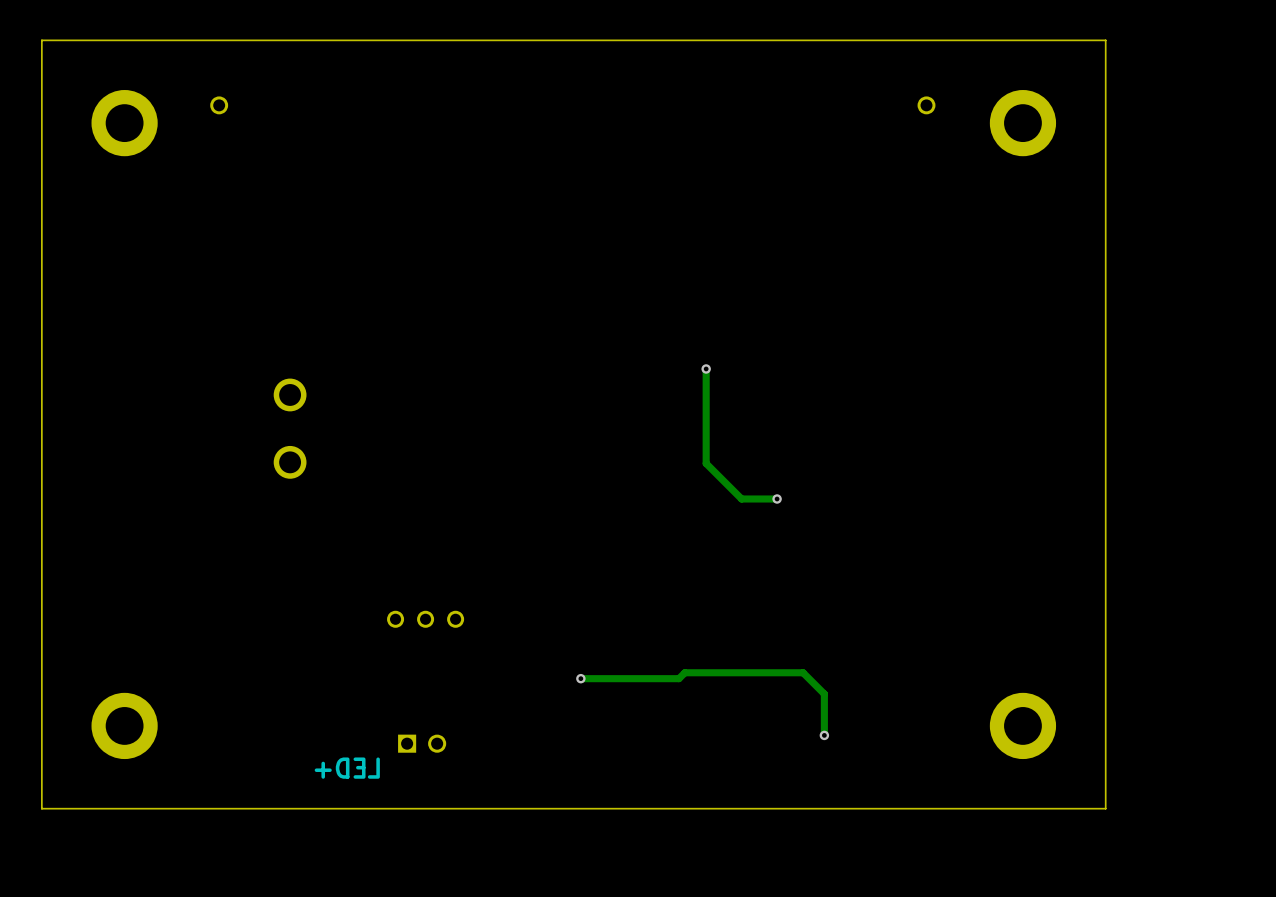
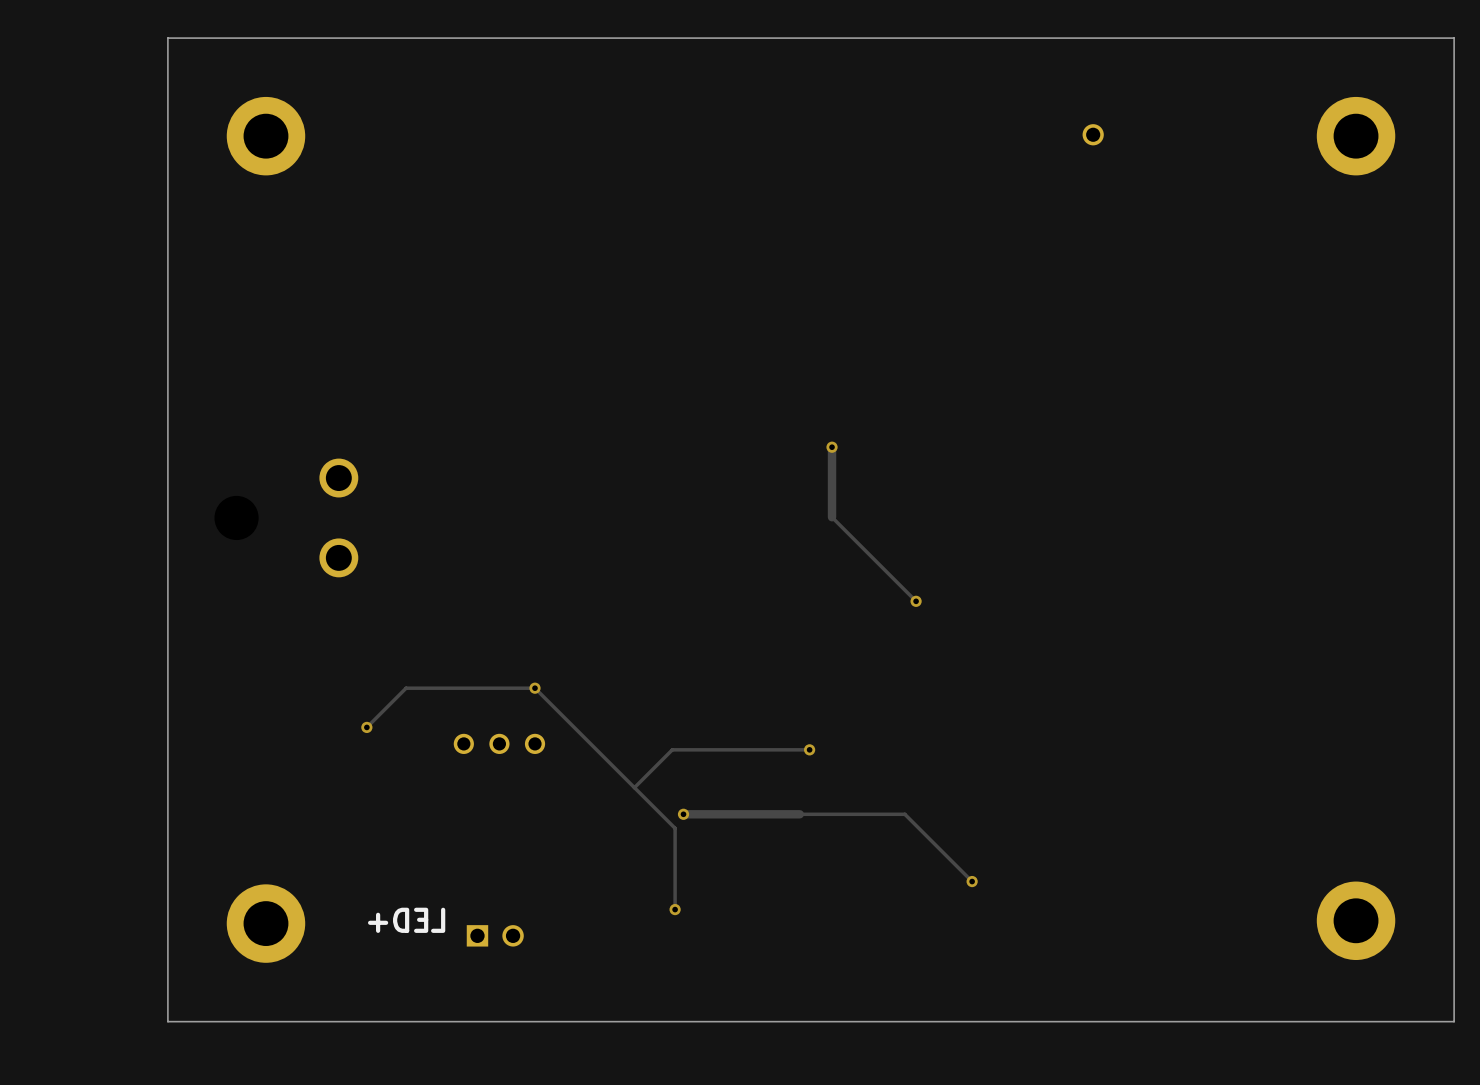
board edge: (1105, 40) (41, 40) (41, 808) (1105, 808) (1105, 40) -> (1454, 38) (1454, 1021) (167, 1021) (167, 38) (1454, 38)
part position: (124, 123) -> (265, 136)
part position: (1022, 123) -> (1356, 136)
track: (706, 428) (706, 463) (741, 498) (777, 498) -> (832, 517) (916, 601)
via: none -> (534, 688)
track: none -> (366, 727) (406, 688) (534, 688) (675, 828) (675, 909)
via: none -> (366, 727)
track: none -> (809, 749) (672, 749) (634, 787)
via: none -> (809, 749)
track: (678, 678) (684, 672) (803, 672) (824, 694) (824, 735) -> (799, 814) (904, 814) (972, 881)
part position: (124, 725) -> (265, 923)
part position: (1022, 725) -> (1356, 920)
part position: (422, 743) -> (495, 935)
via: none -> (675, 909)

